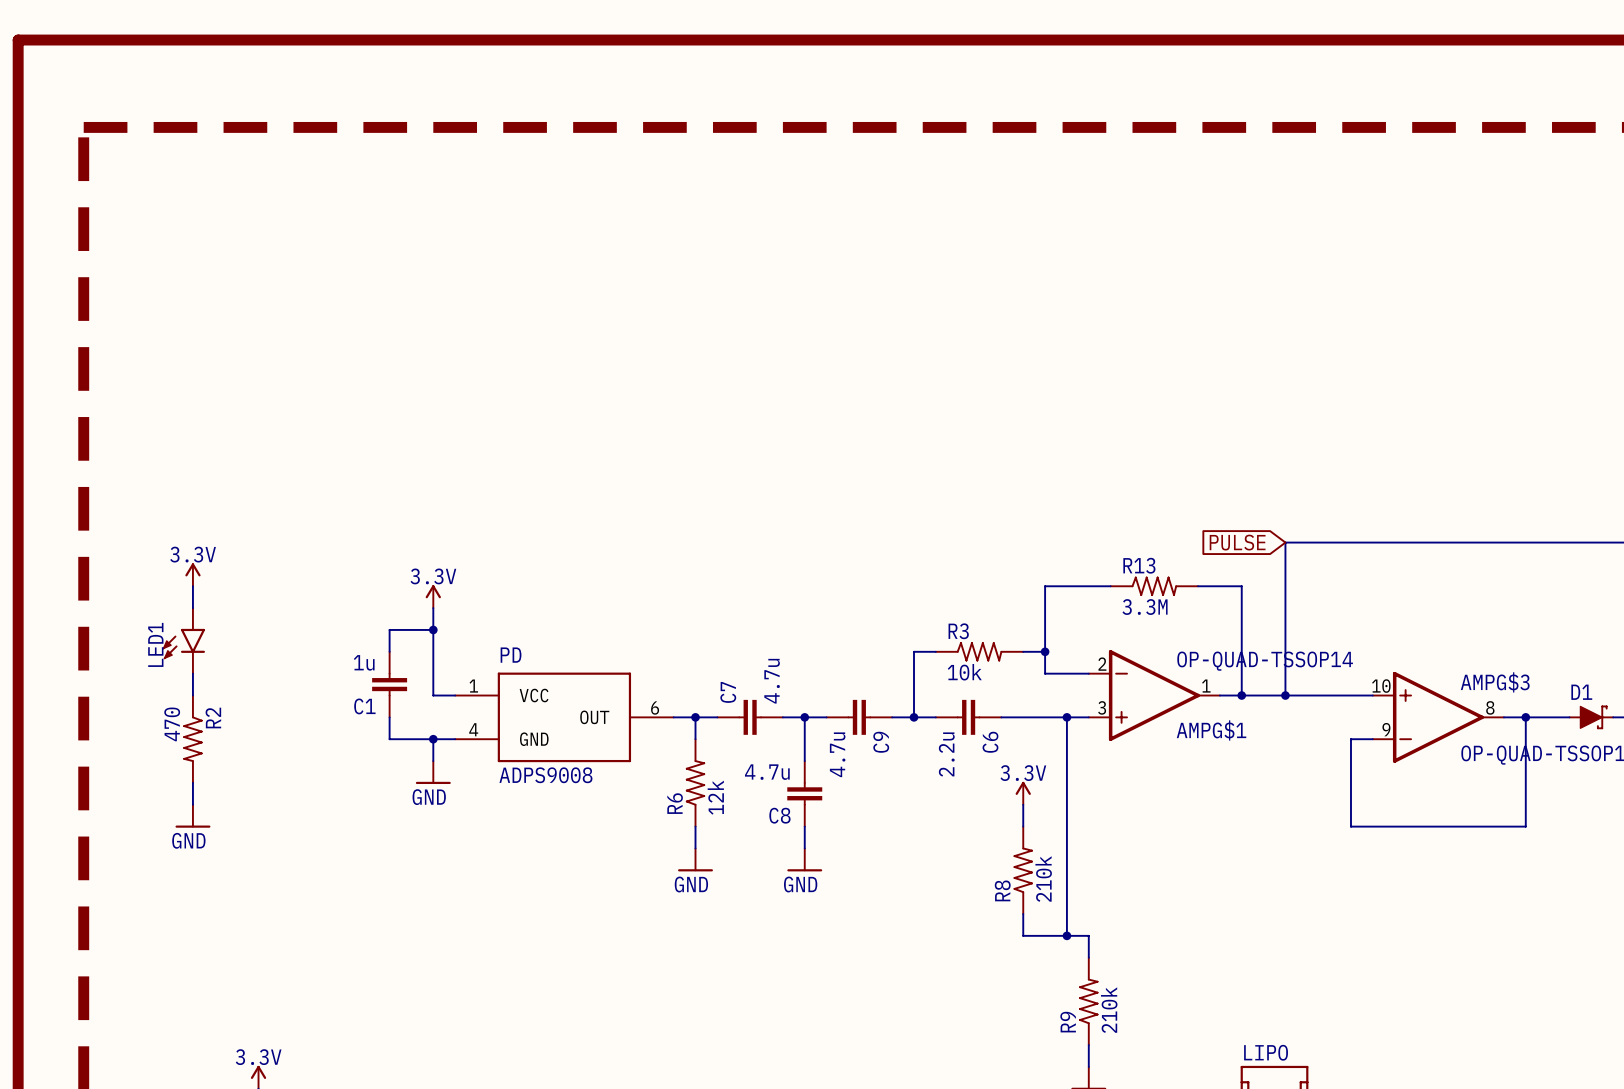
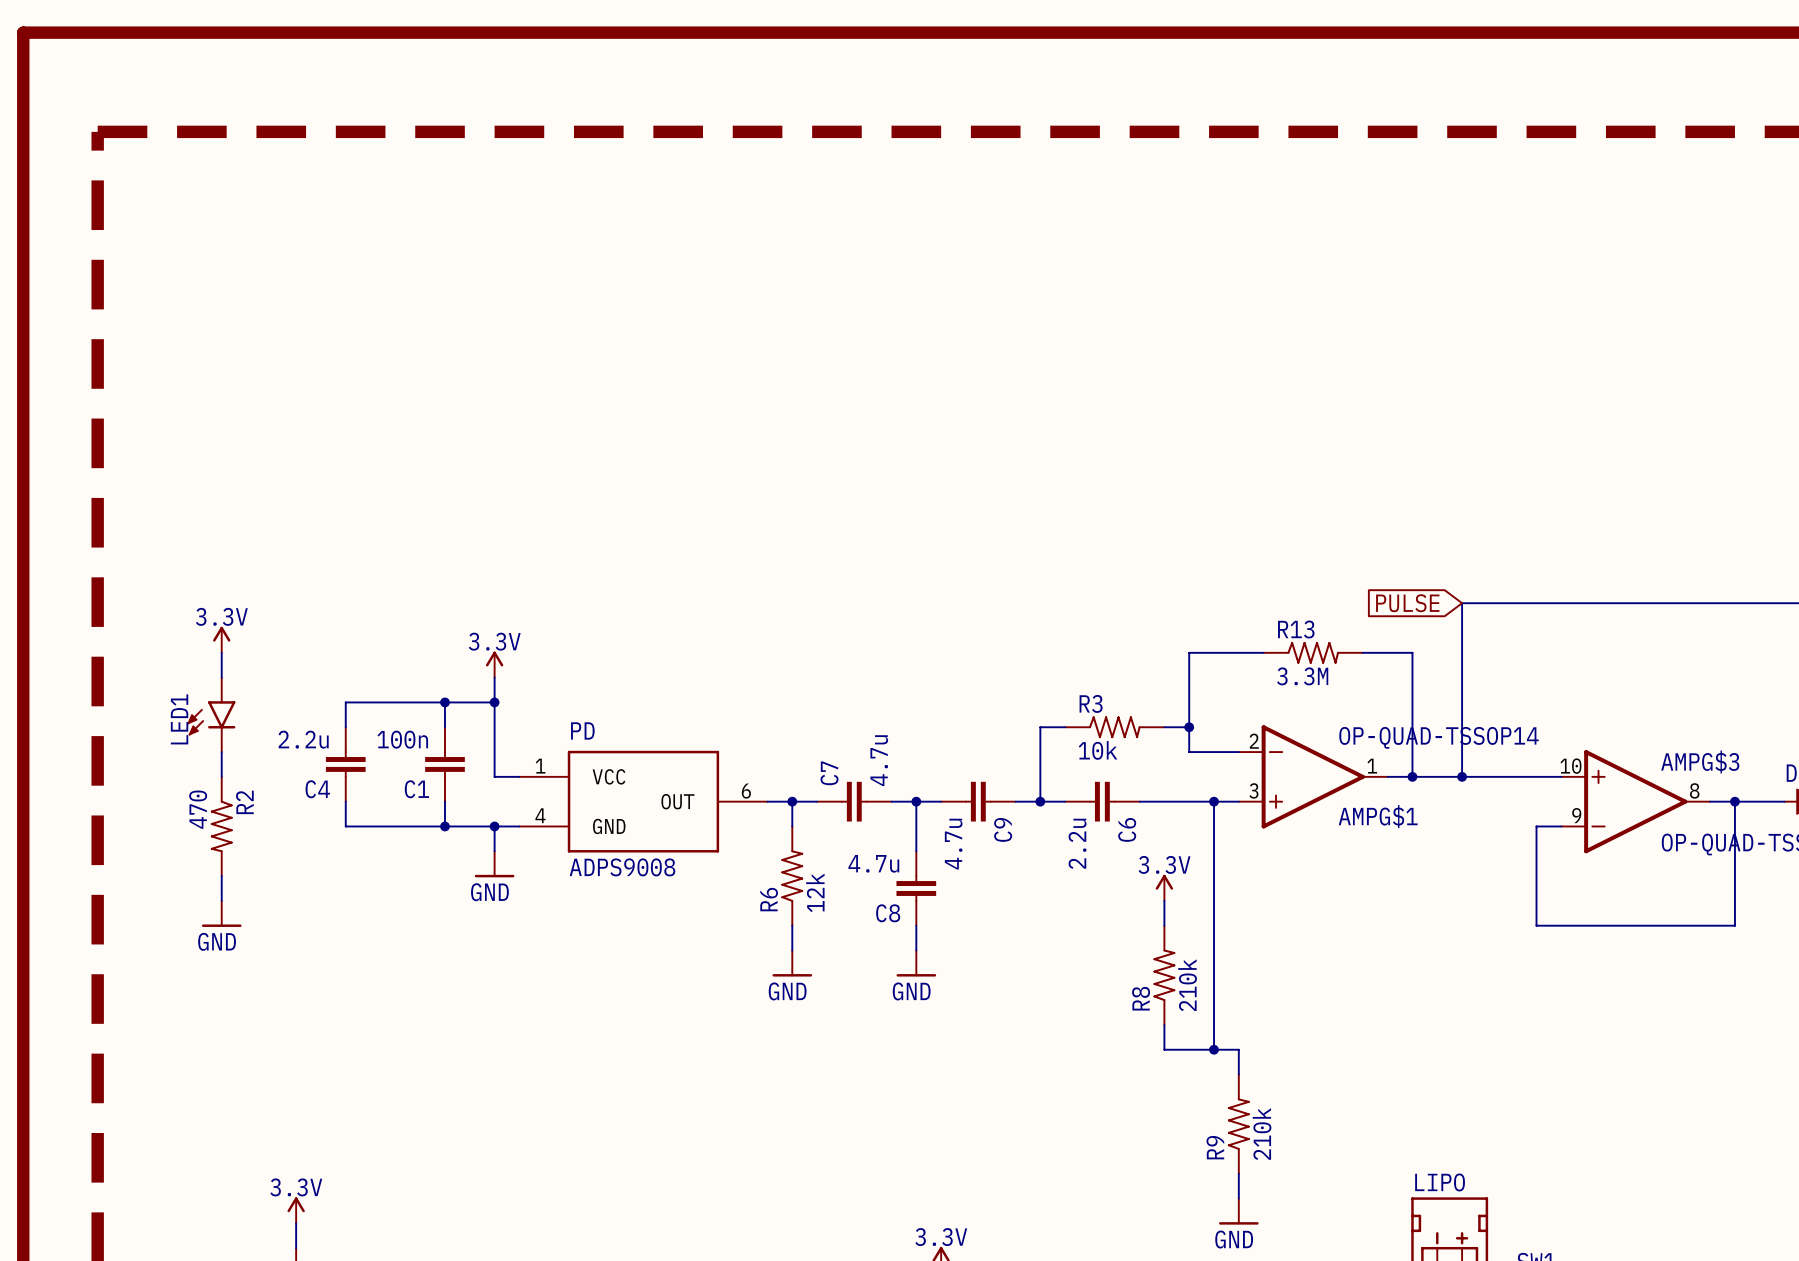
wire: none -> (444, 702) (345, 702) (345, 727)
junction: none -> (444, 702)
C1 value: 1u (364, 662) -> 100n (402, 739)
C4: none -> 2.2u (345, 764)
wire: none -> (345, 801) (345, 826) (444, 826)
junction: none -> (444, 826)

